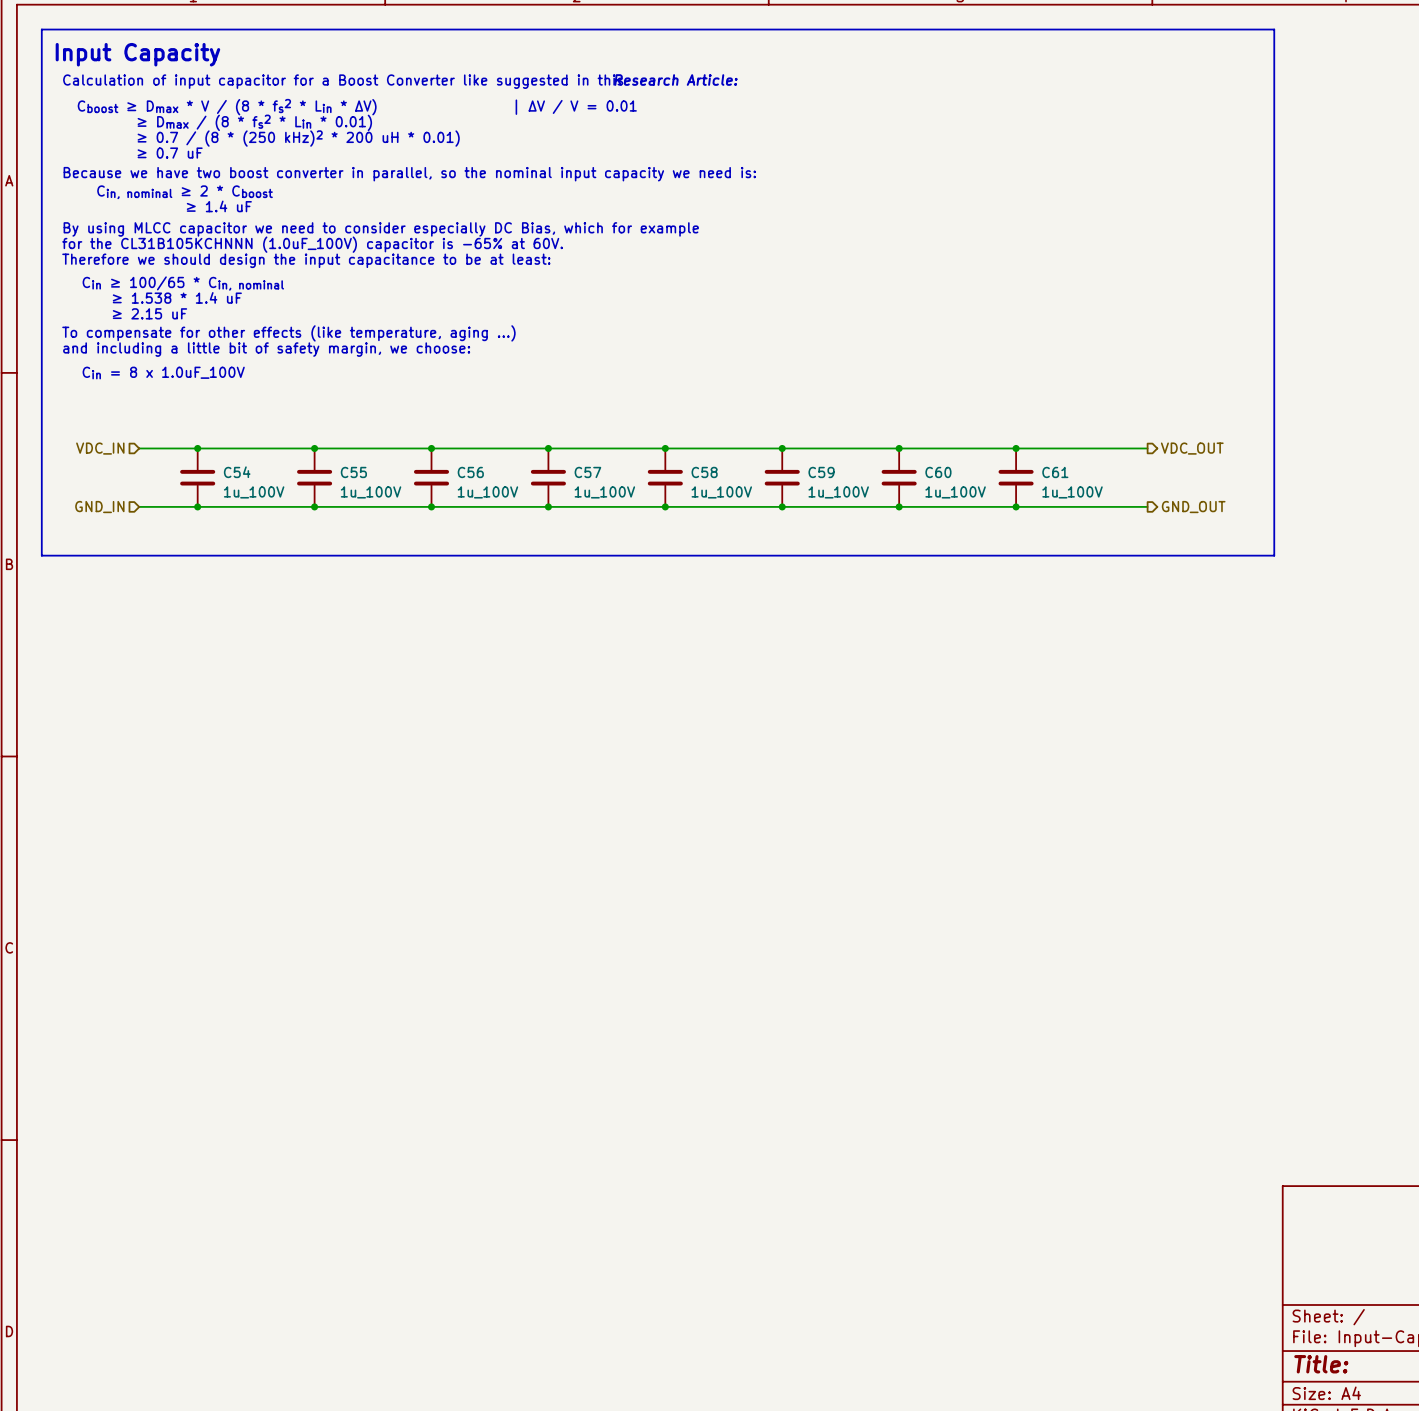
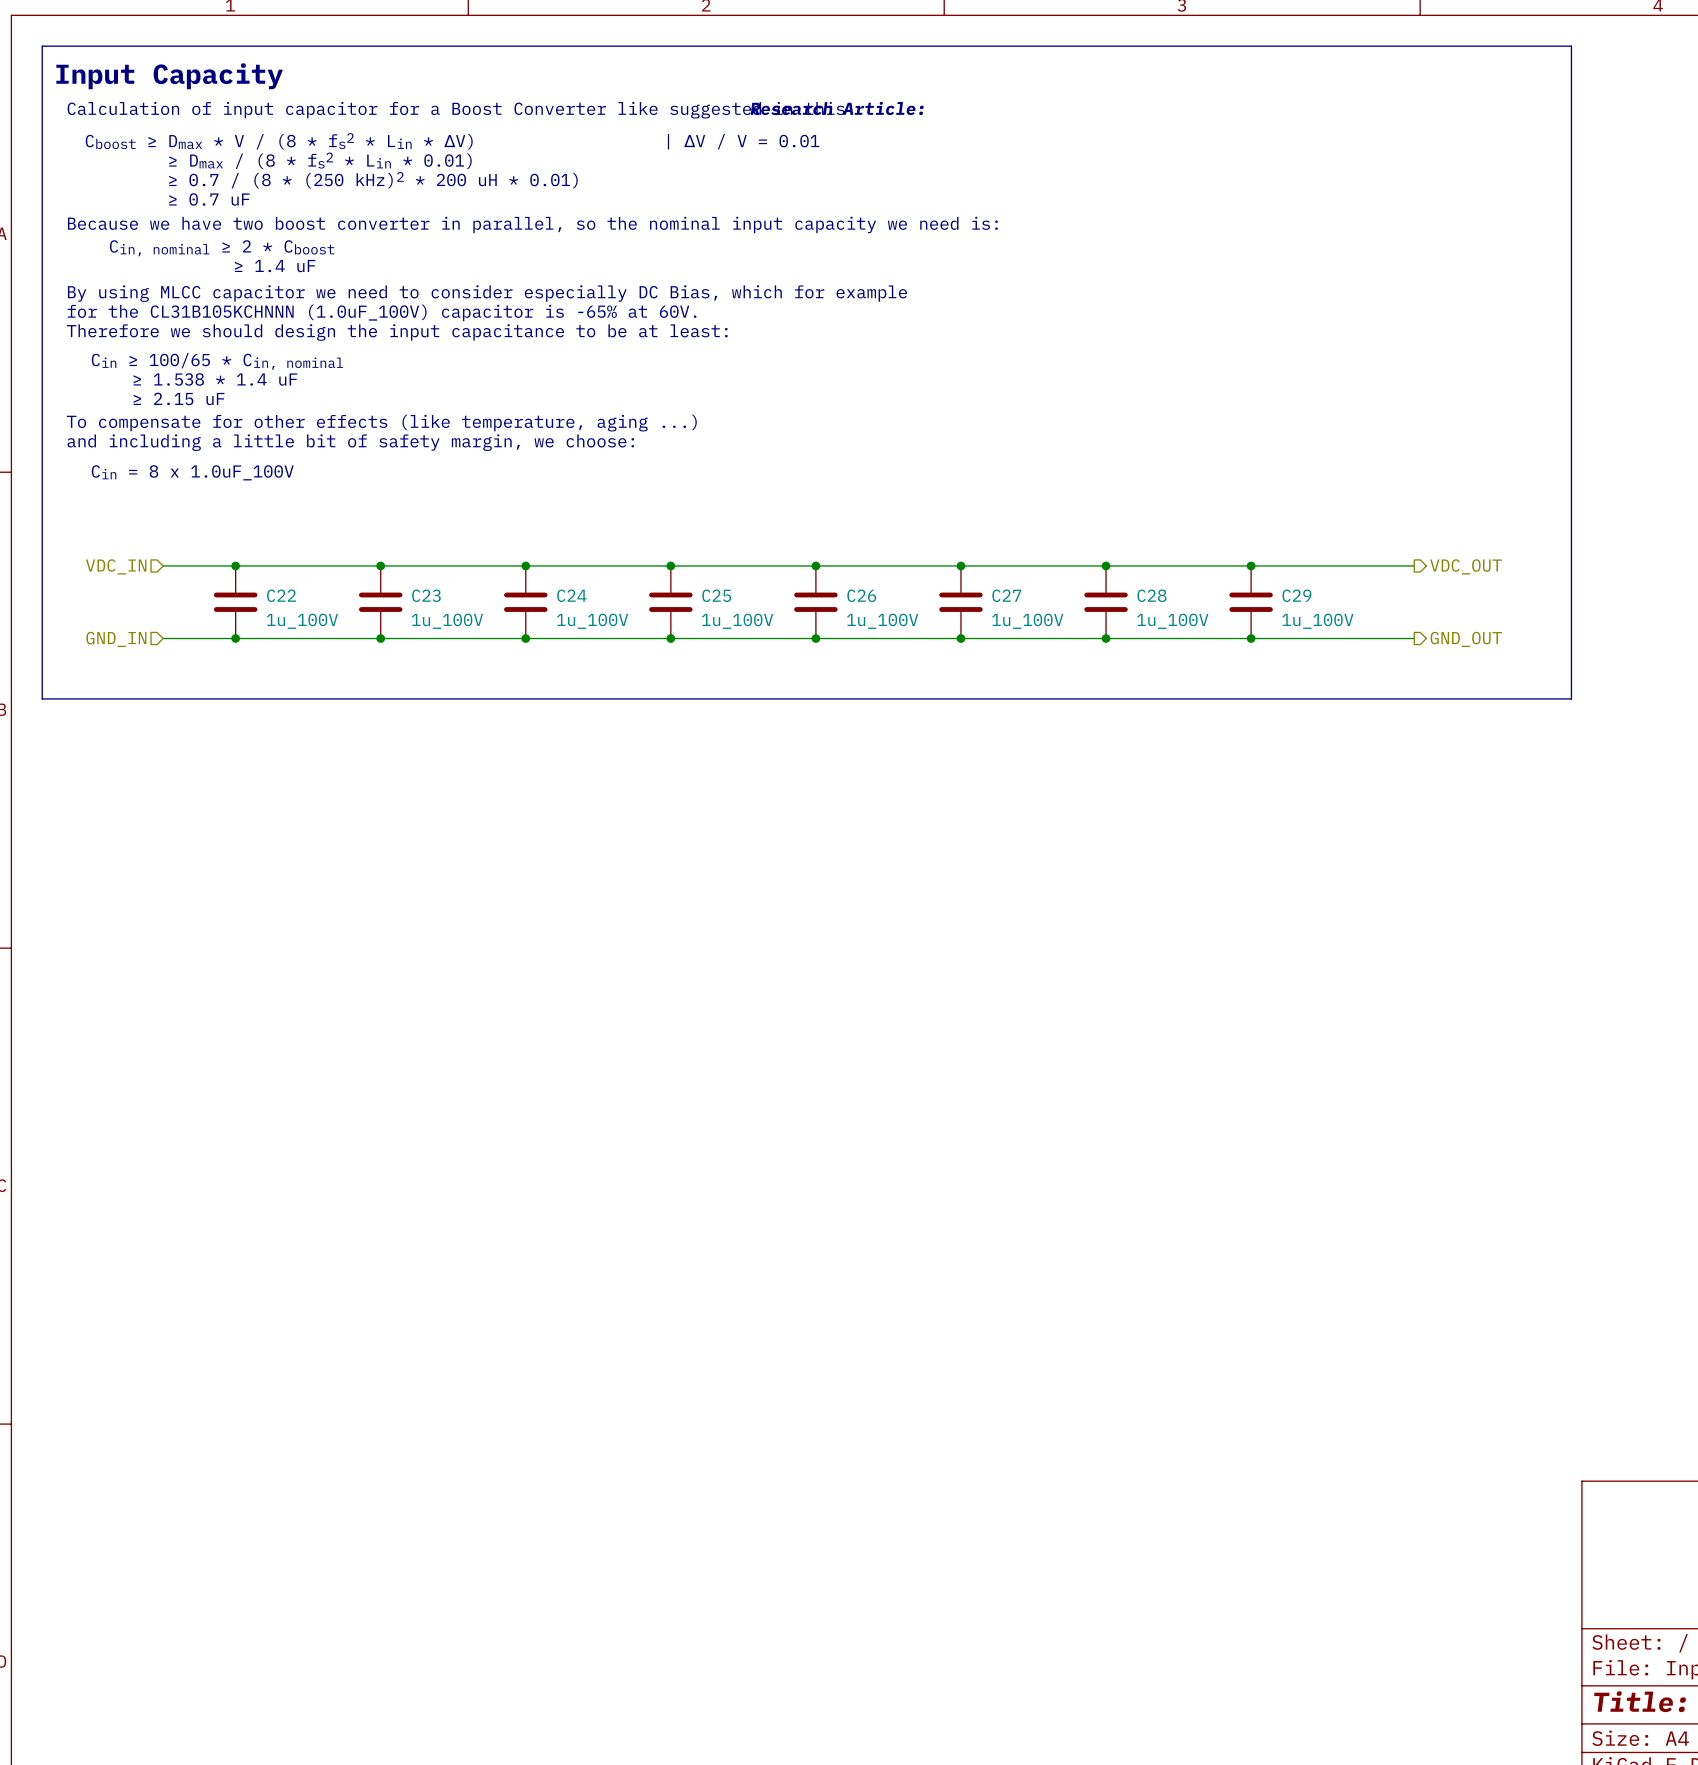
C54 name: C54 (237, 472) -> C22 (281, 595)
C55 name: C55 (353, 472) -> C23 (426, 595)
C56 name: C56 (470, 472) -> C24 (571, 595)
C57 name: C57 (587, 472) -> C25 (716, 595)
C58 name: C58 (704, 472) -> C26 (861, 595)
C59 name: C59 (821, 472) -> C27 (1006, 595)
C60 name: C60 (938, 472) -> C28 (1151, 595)
C61 name: C61 (1055, 472) -> C29 (1296, 595)

